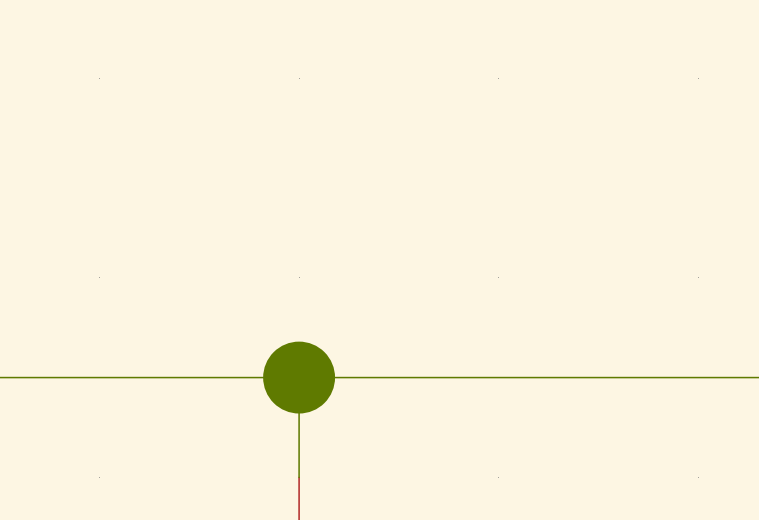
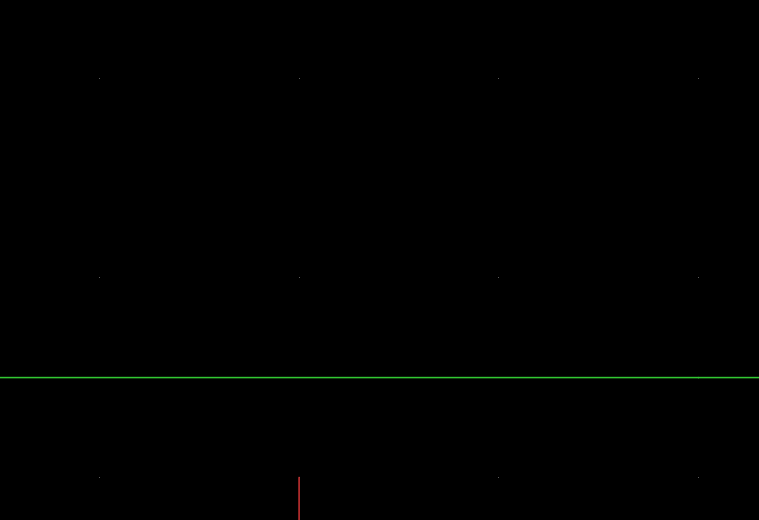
wire: (299, 377) (299, 477) -> none
junction: (299, 377) -> none

